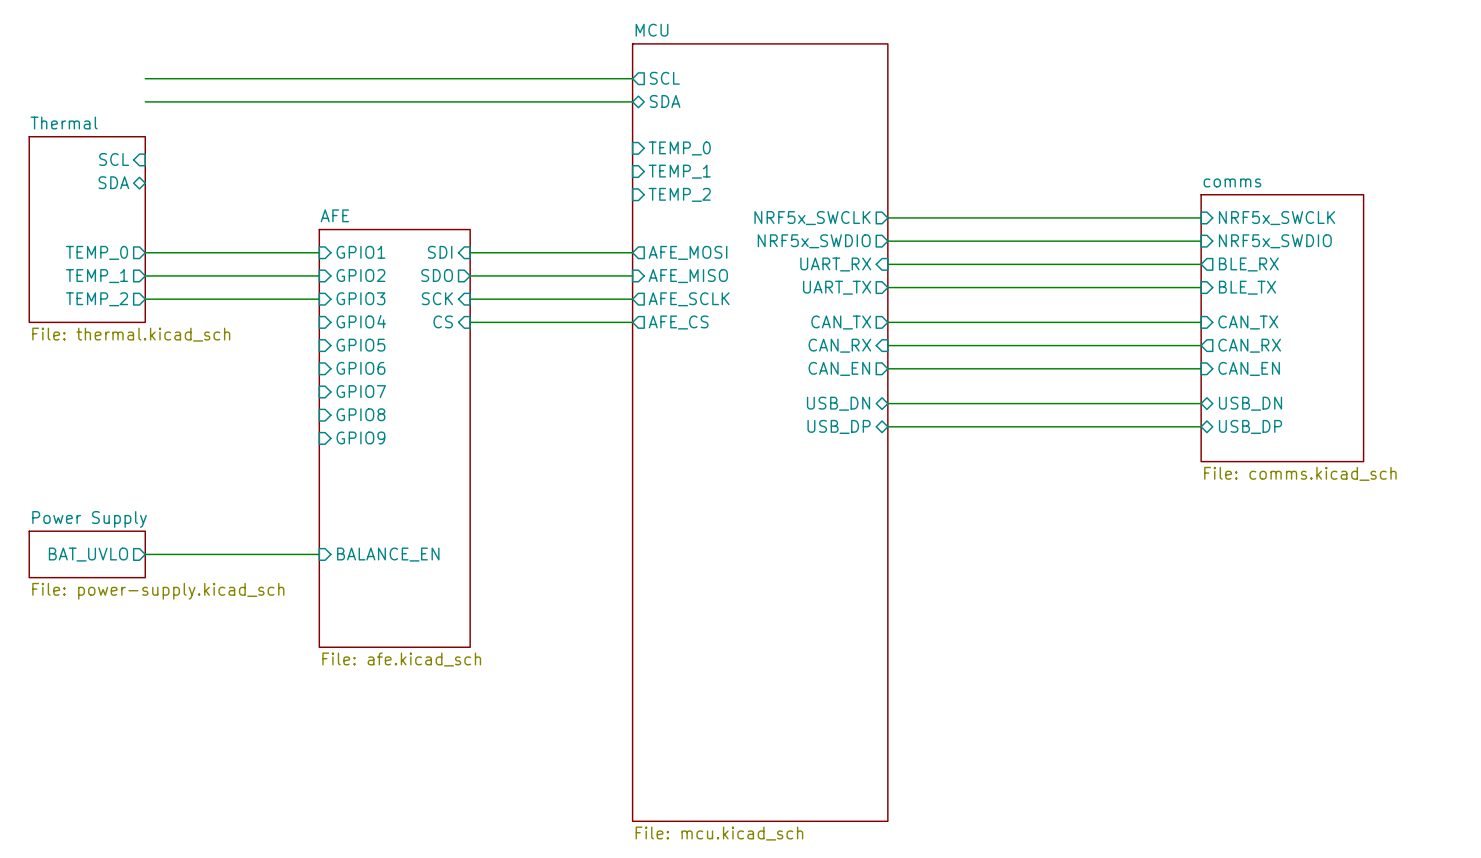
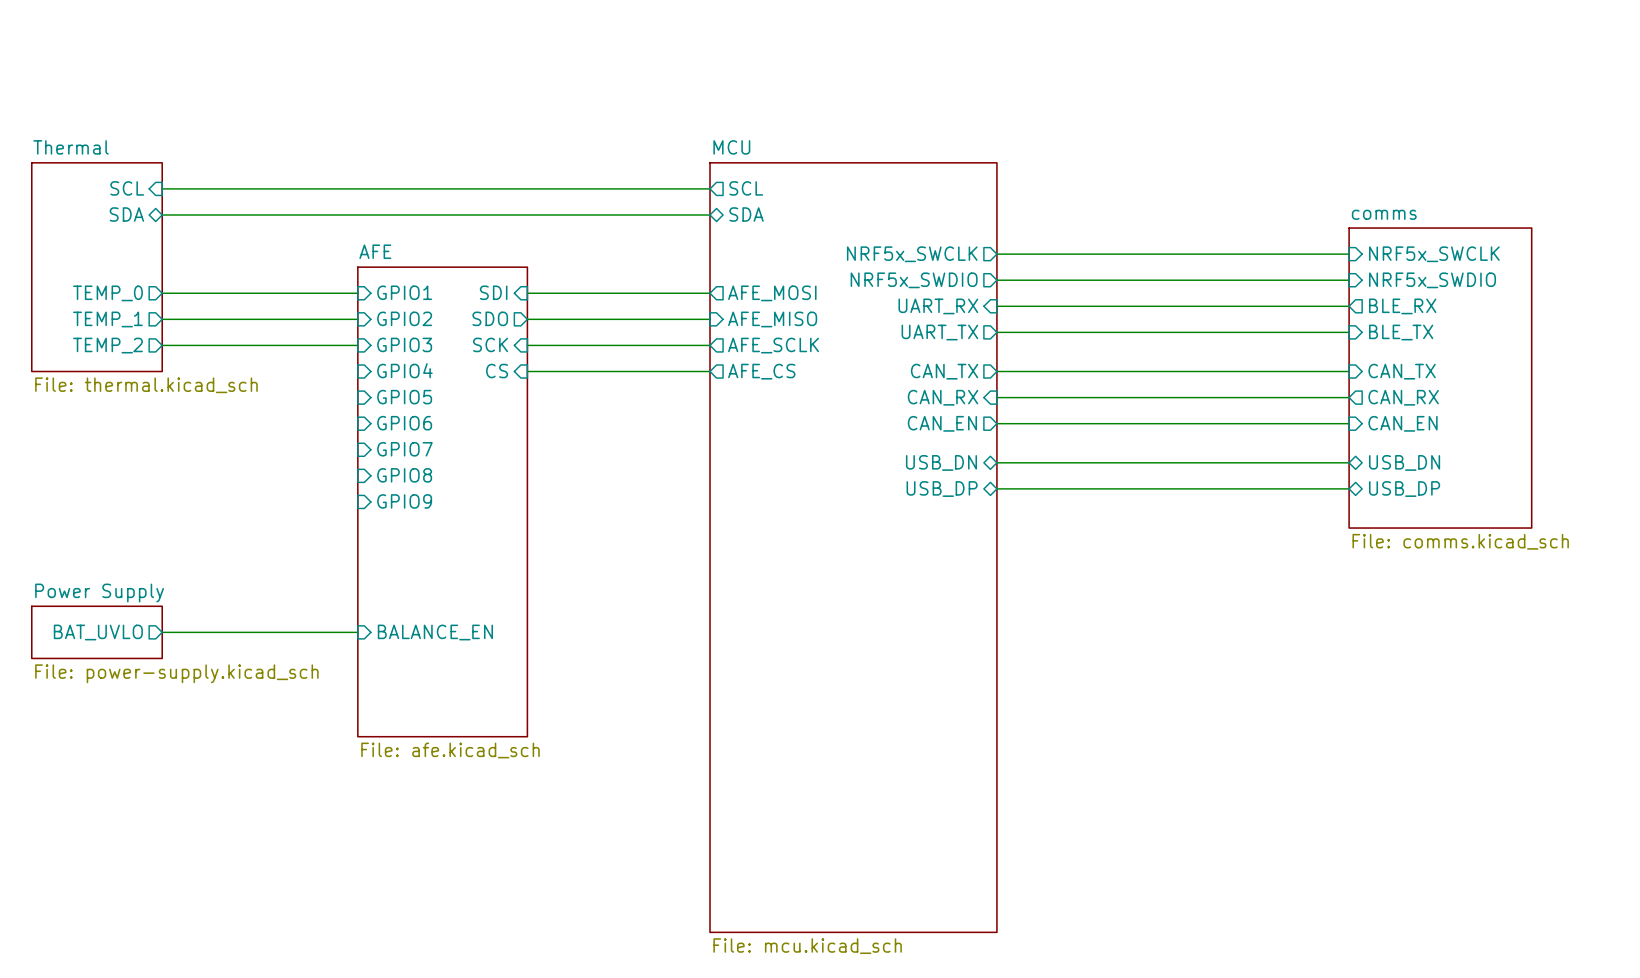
wire: (145, 78) (632, 78) -> (162, 215) (710, 215)
sheet pin position: SCL (664, 78) -> SCL (746, 188)
wire: (145, 101) (632, 101) -> (162, 188) (710, 188)
sheet pin position: SDA (665, 101) -> SDA (746, 214)
sheet pin: TEMP_0 (679, 148) -> none
sheet pin: TEMP_1 (679, 171) -> none
sheet pin: TEMP_2 (679, 194) -> none
sheet MCU: File: mcu.kicad_sch (760, 432) -> none
sheet MCU: none -> File: mcu.kicad_sch (853, 547)

